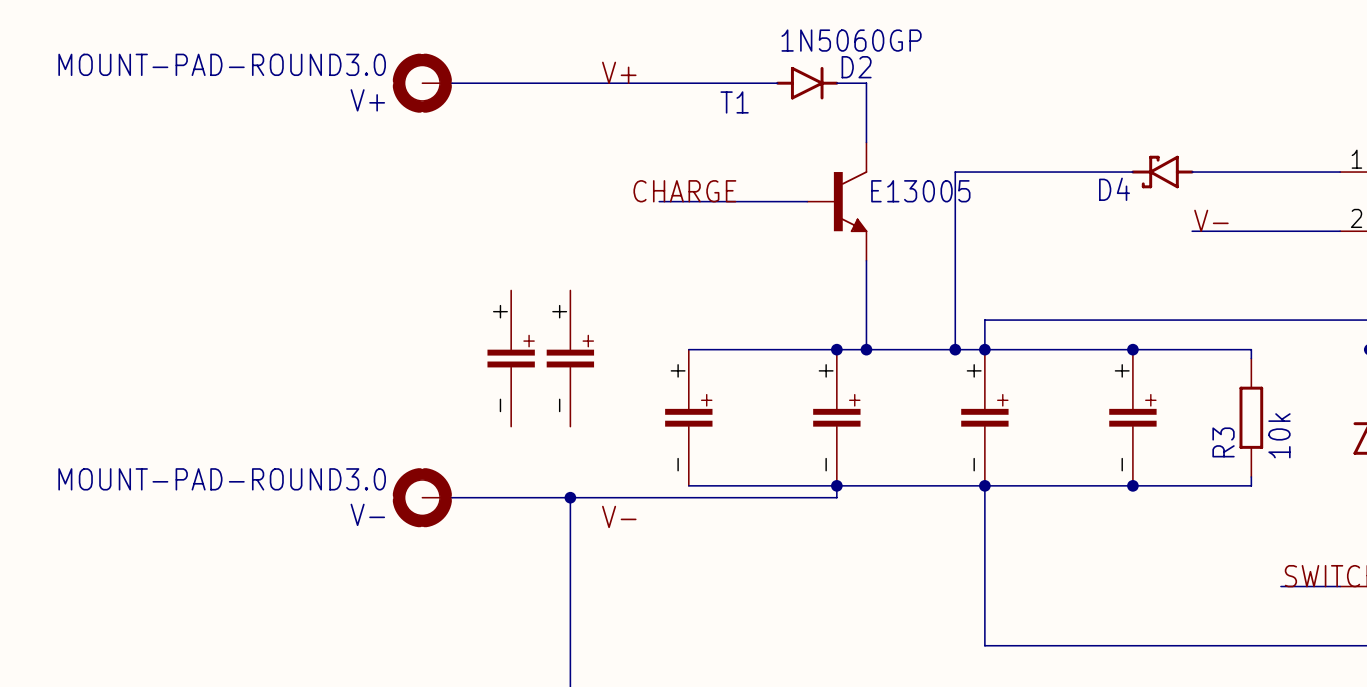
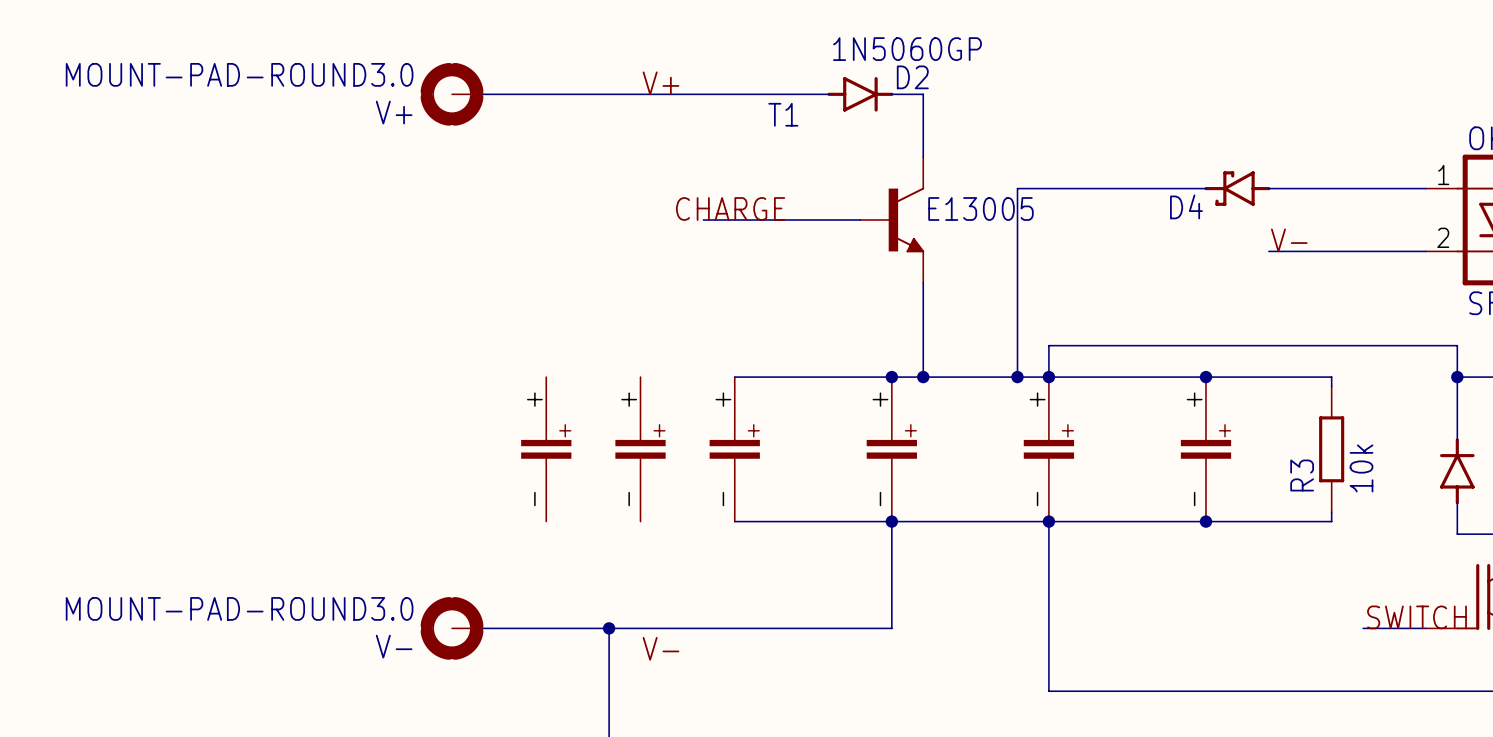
part: (511, 358) -> none
part: (570, 358) -> none
part: none -> (546, 449)
part: none -> (640, 449)
V- position: (422, 497) -> (452, 628)
wire: (451, 497) (836, 497) -> (483, 628) (891, 628) (891, 534)
wire: (570, 497) (570, 586) -> none
junction: (570, 497) -> none
label position: V- (619, 516) -> V- (660, 648)
junction: none -> (609, 628)

